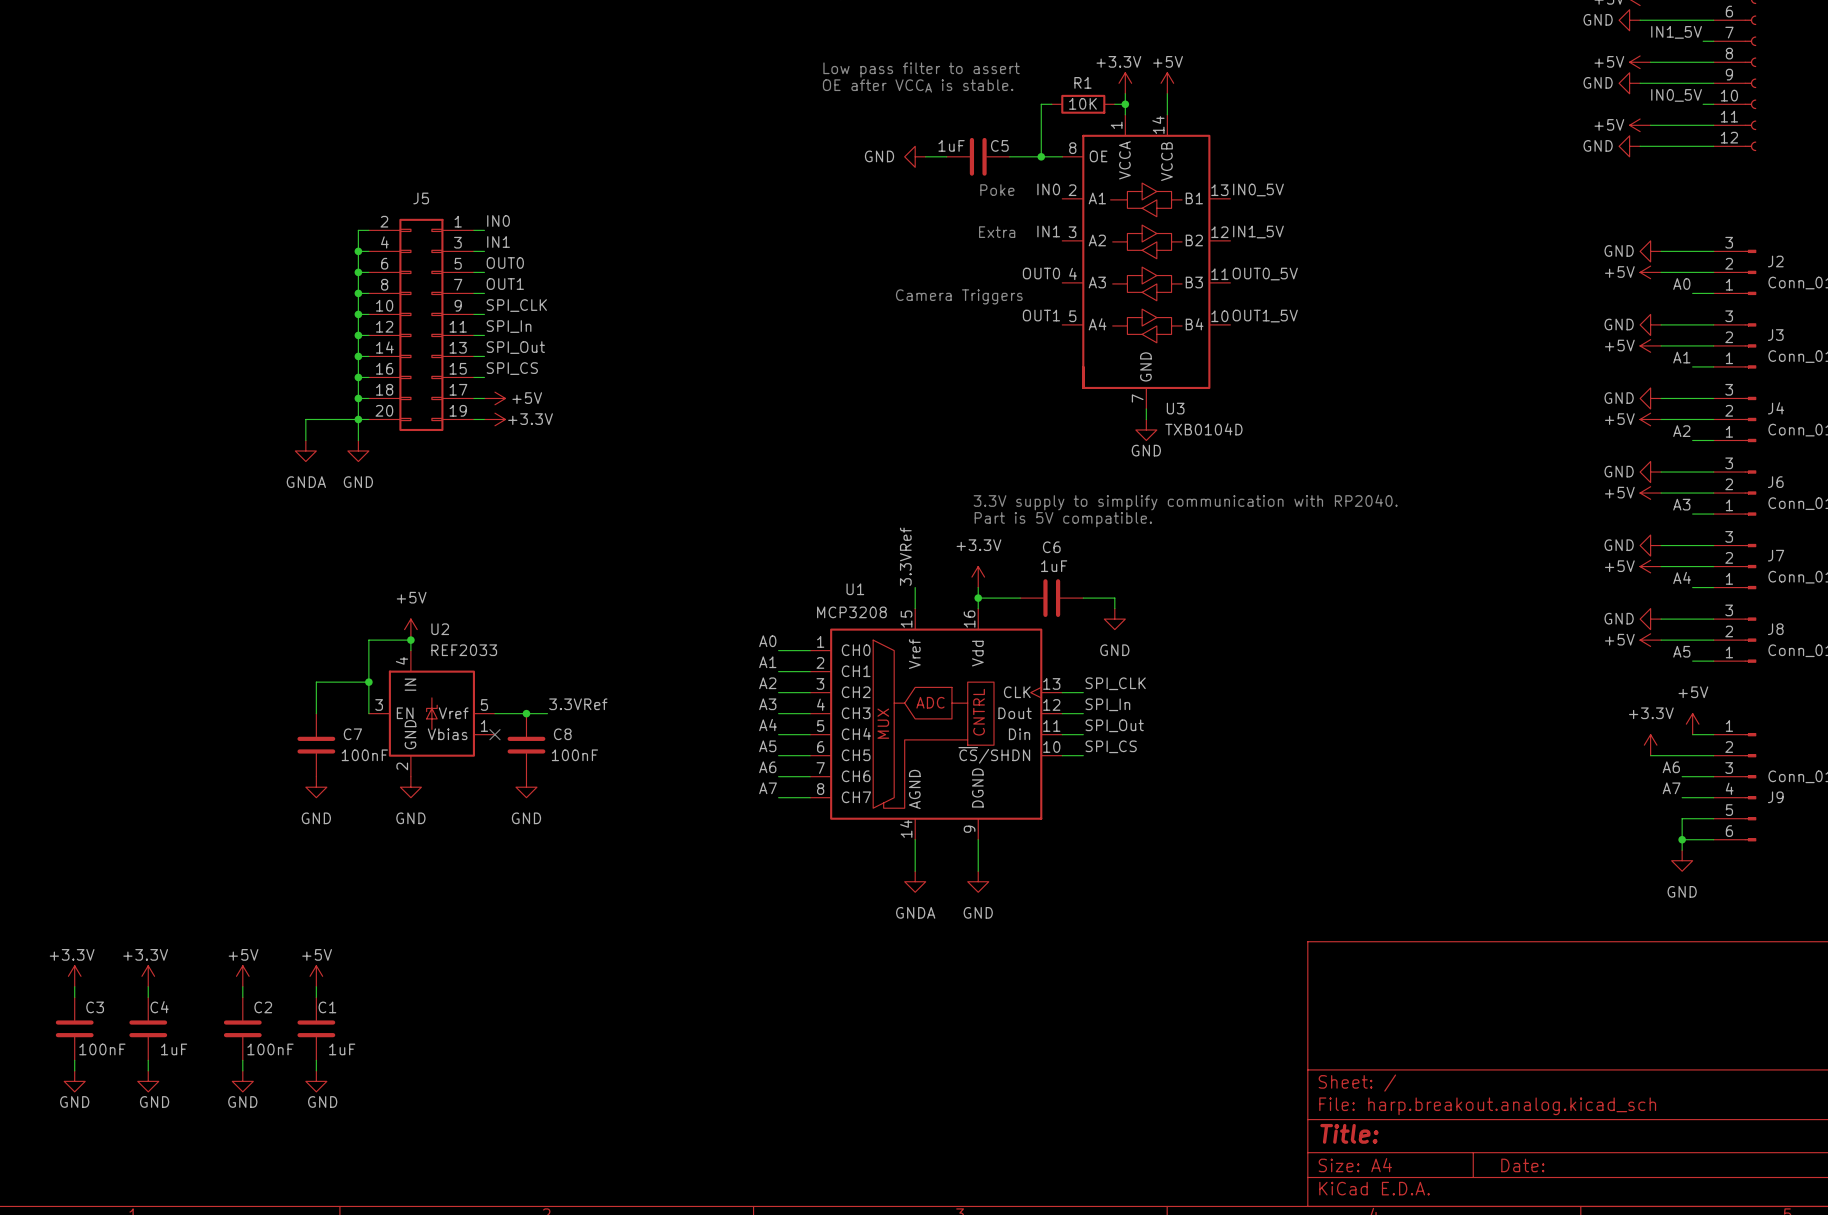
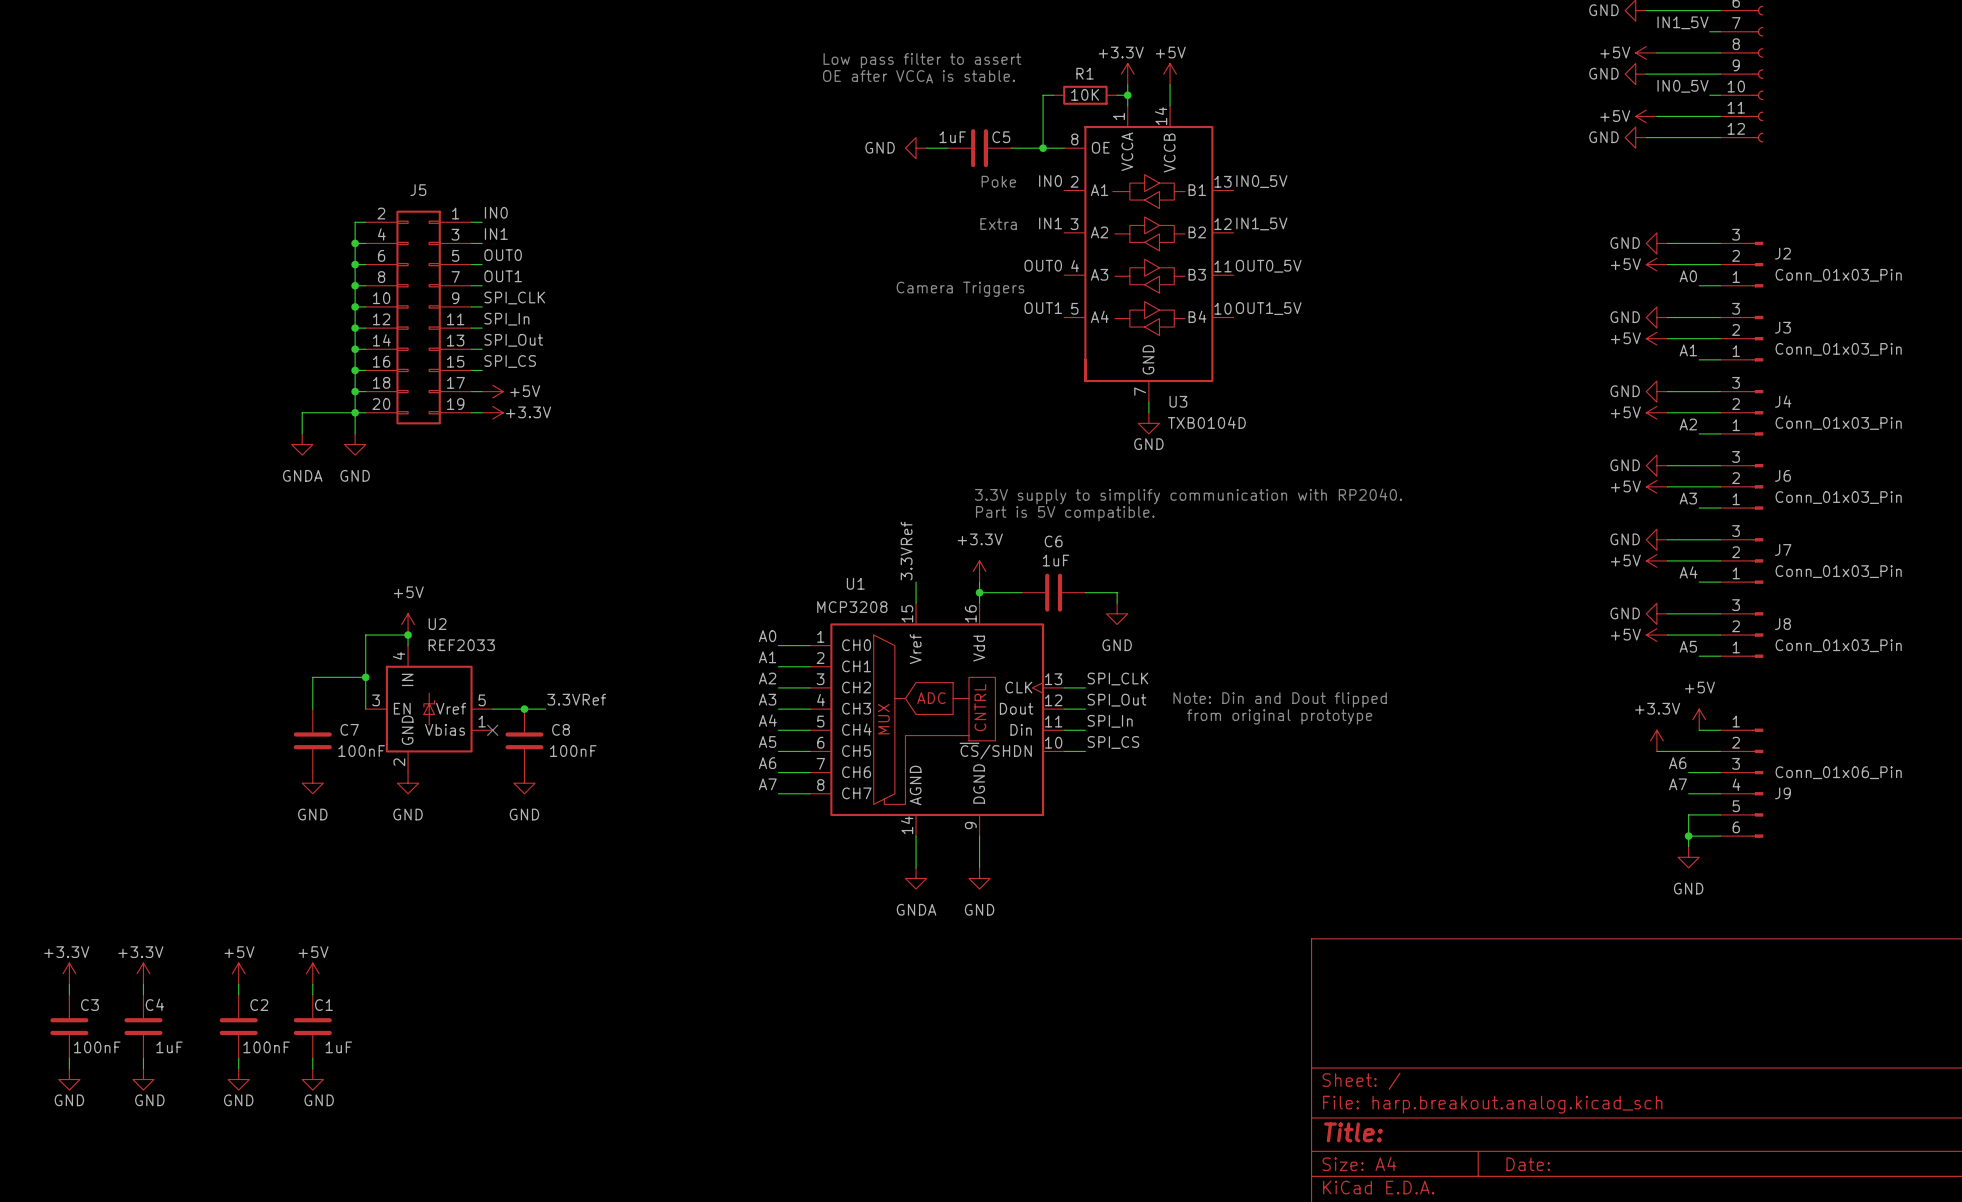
label: SPI_In (1107, 704) -> SPI_Out (1116, 700)
text: none -> Note: Din and Dout flipped (1280, 699)
text: none -> from original prototype (1279, 716)
label: SPI_Out (1114, 725) -> SPI_In (1110, 721)

